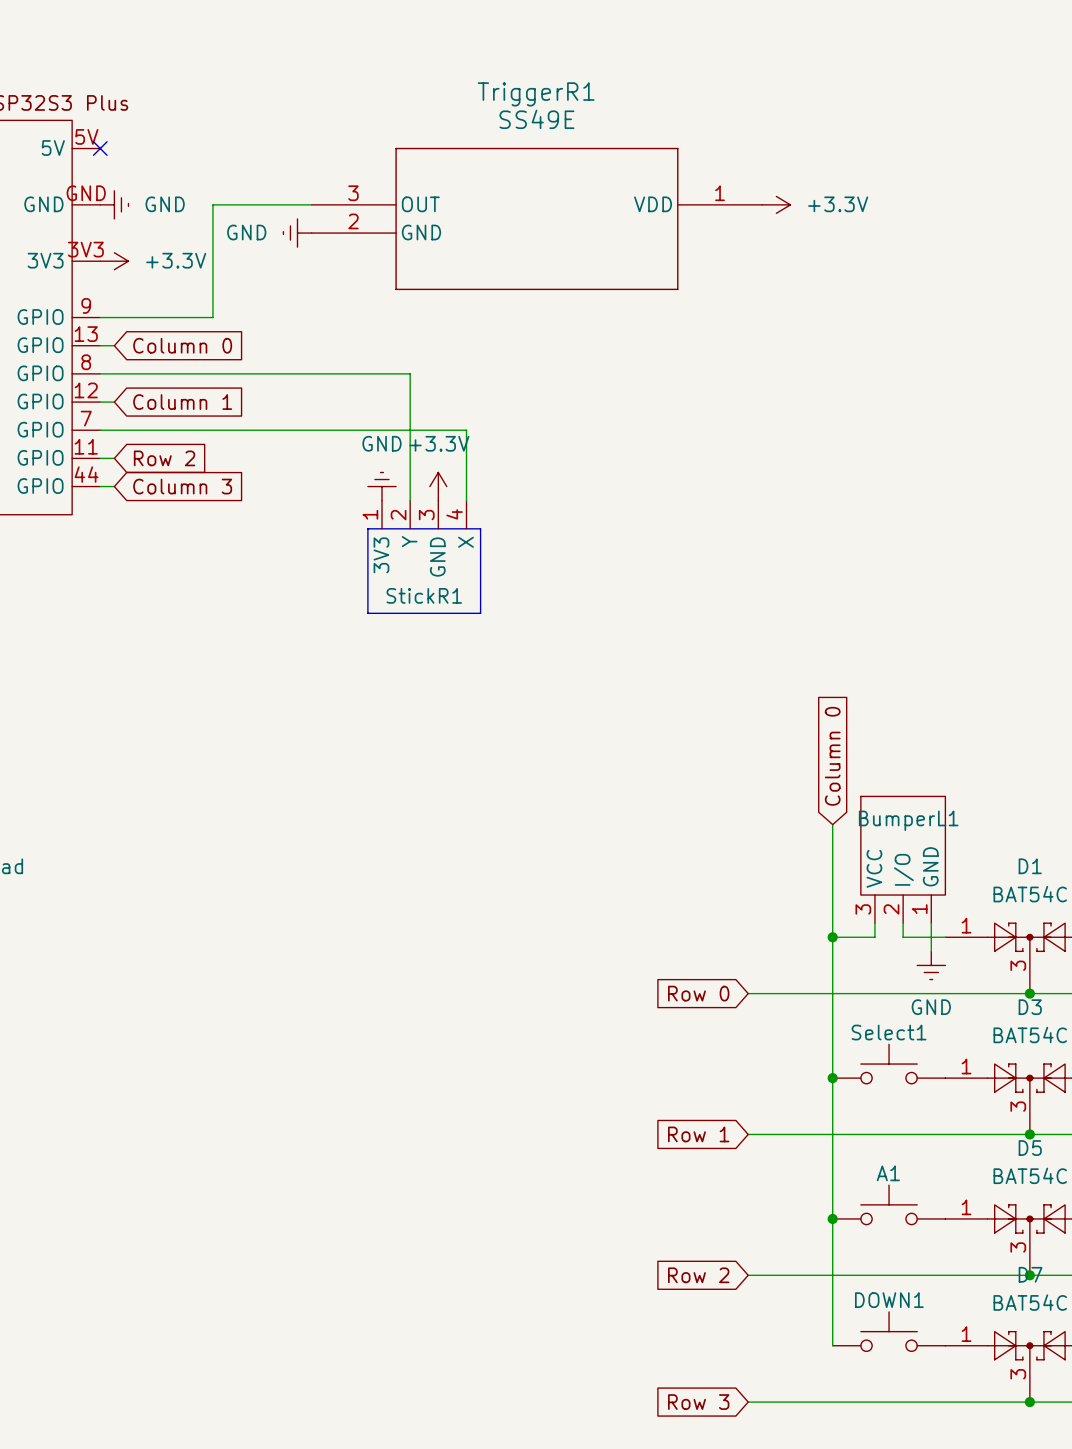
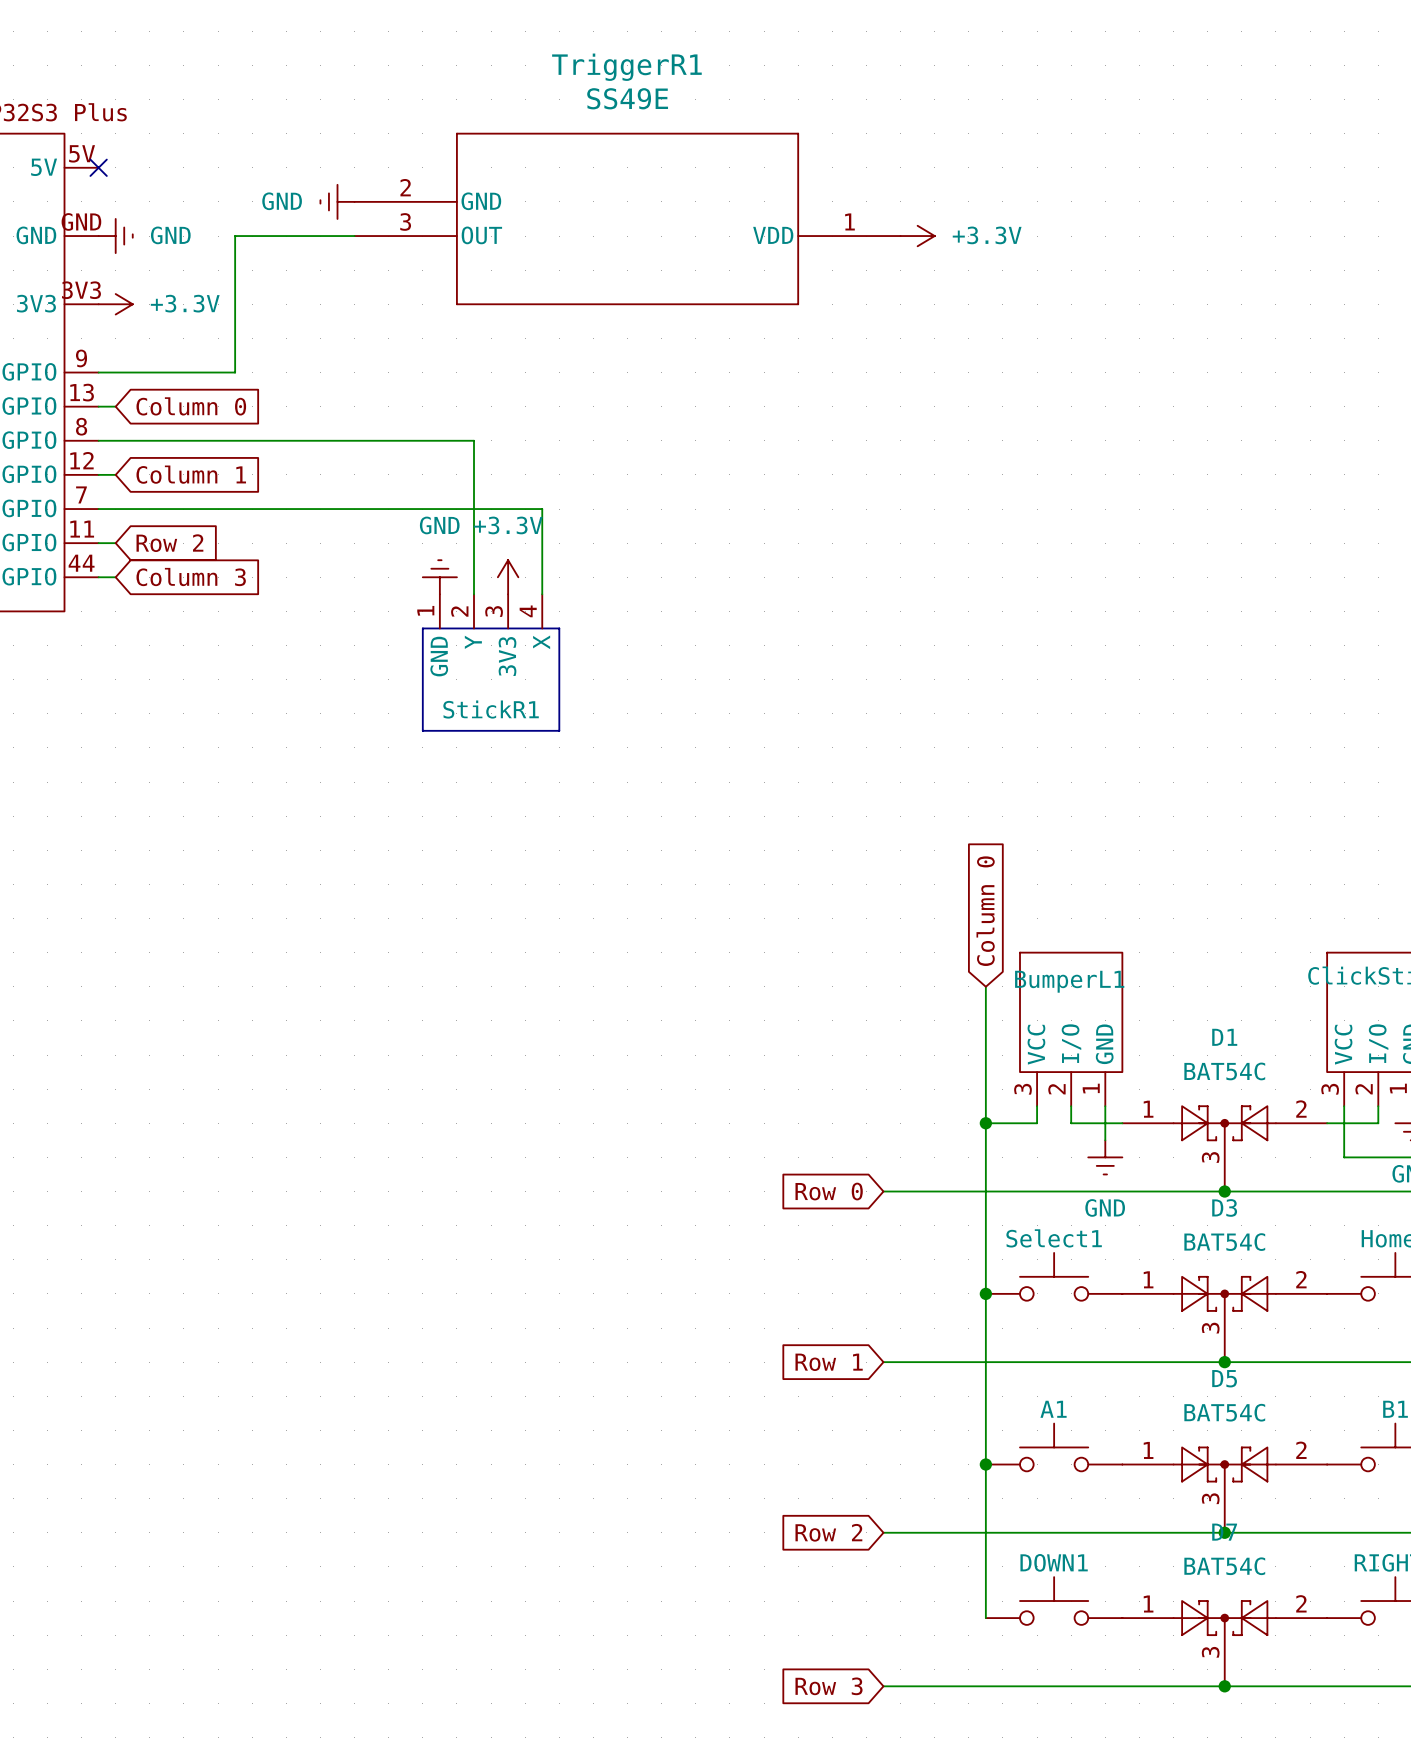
TriggerR1 flip: as is (536, 218) -> up-down (627, 218)
power symbol position: GND (297, 233) -> GND (337, 201)
StickR1 pin name: 3V3 (381, 555) -> GND (439, 656)
StickR1 pin name: GND (437, 557) -> 3V3 (507, 656)

